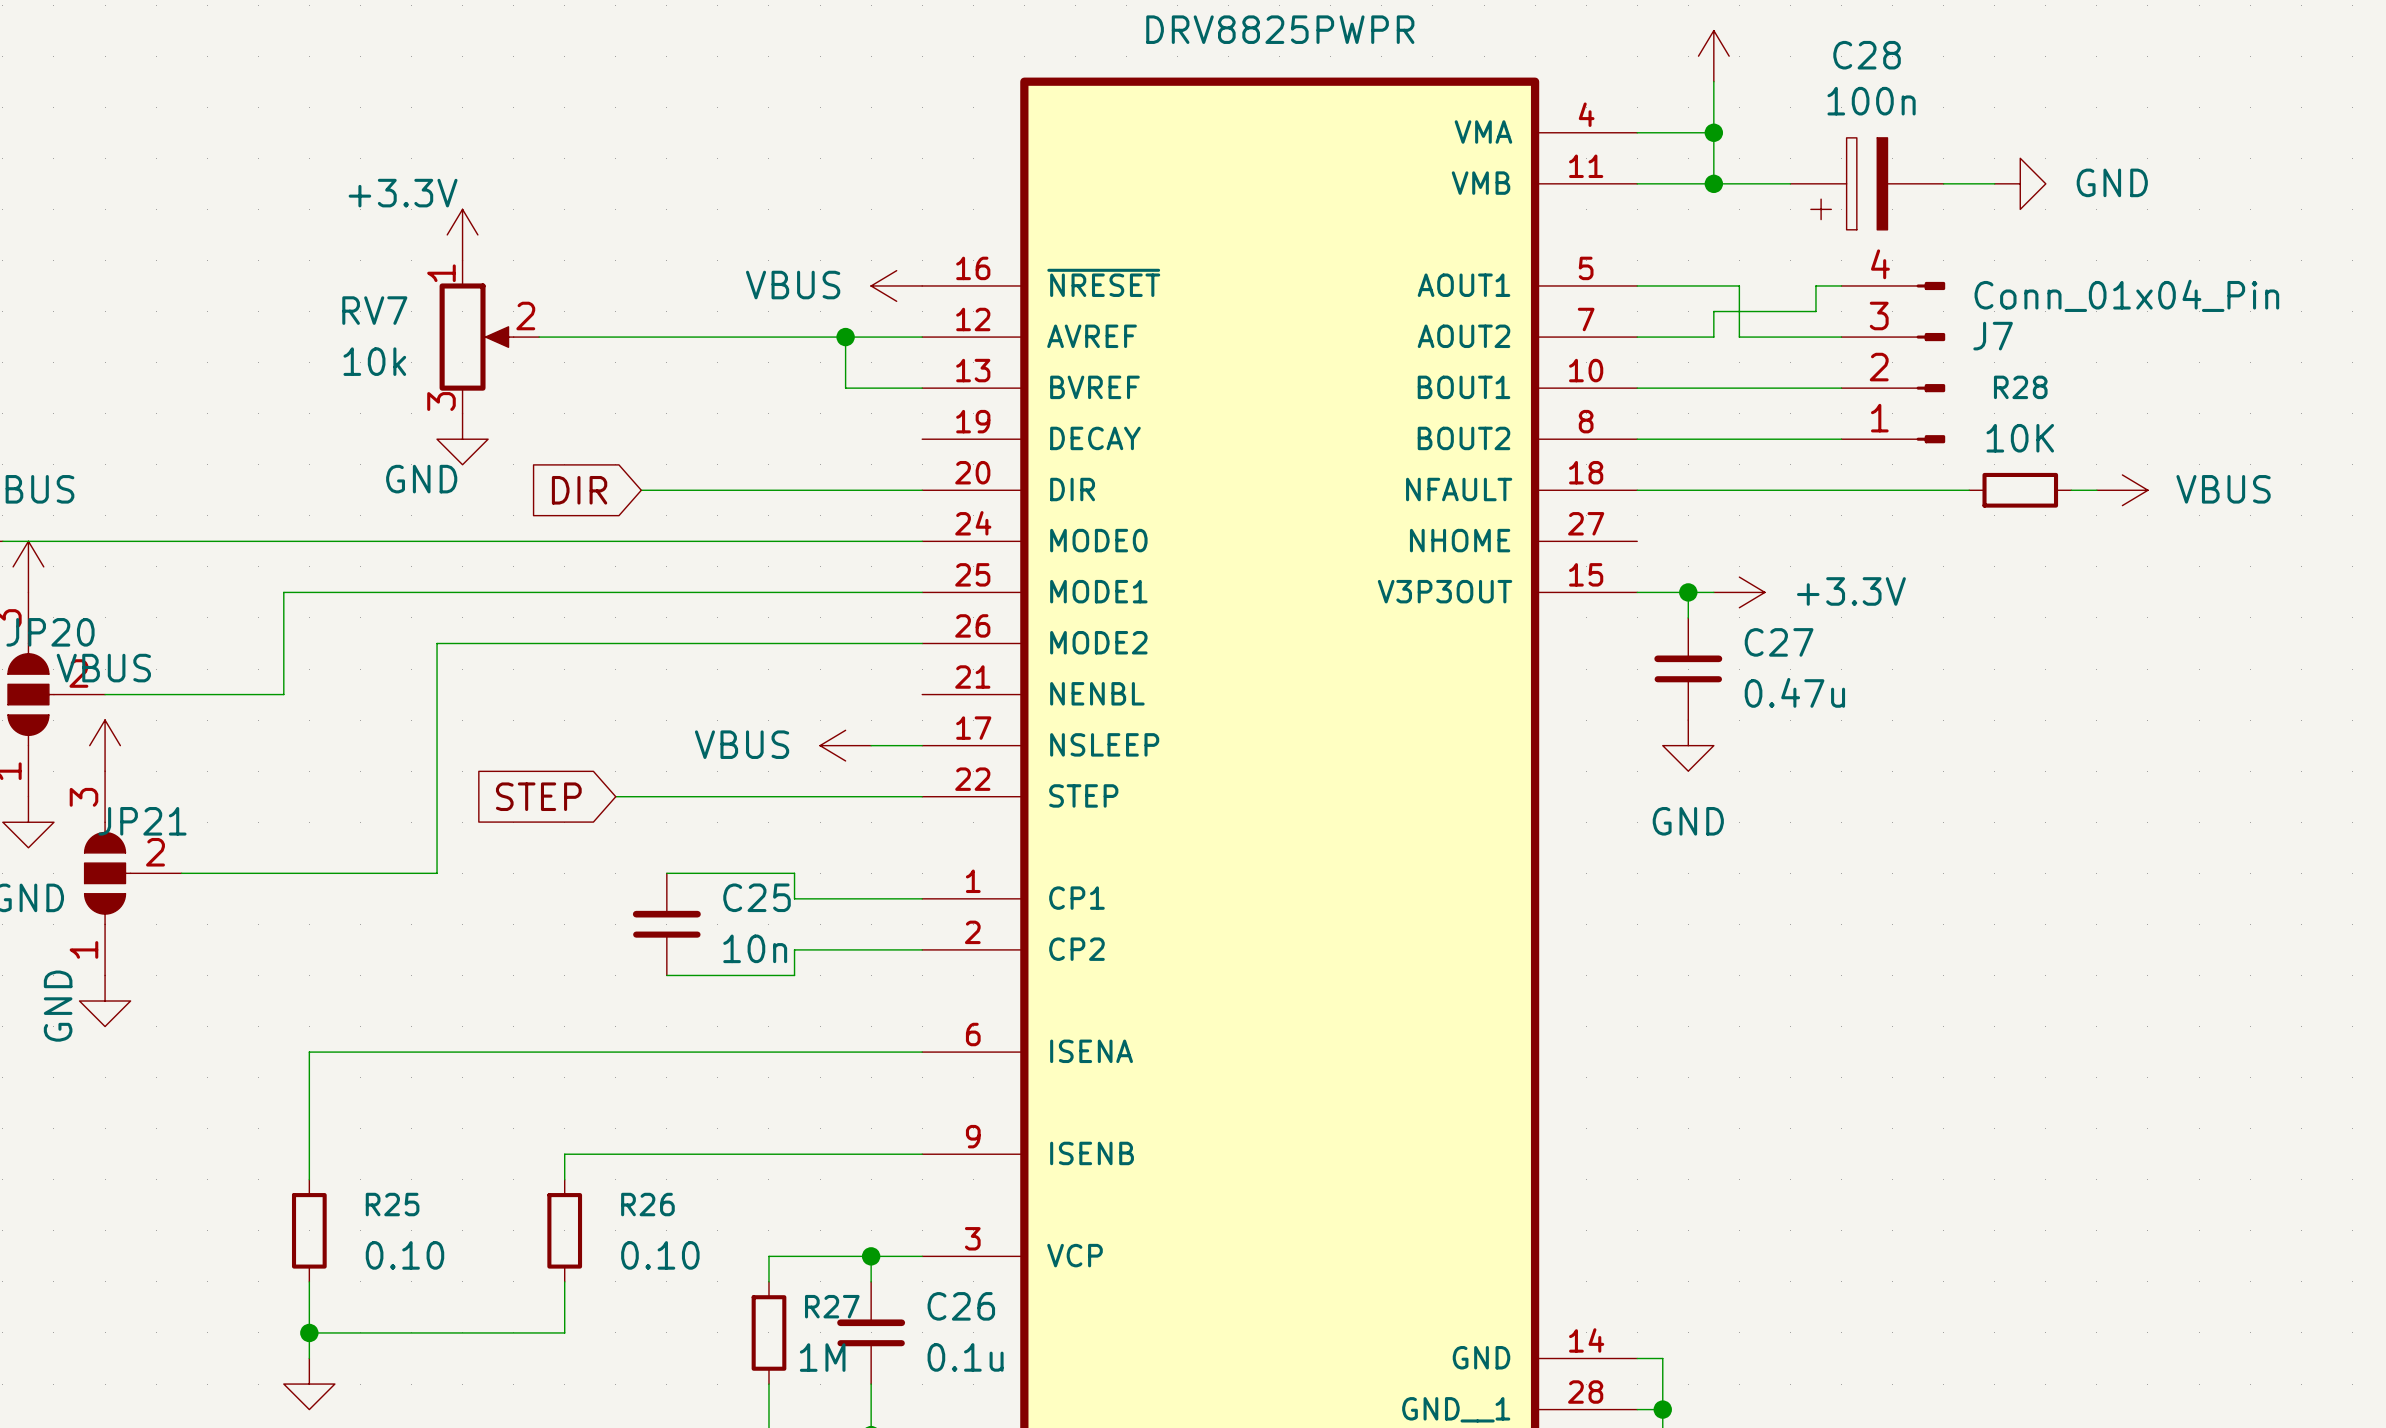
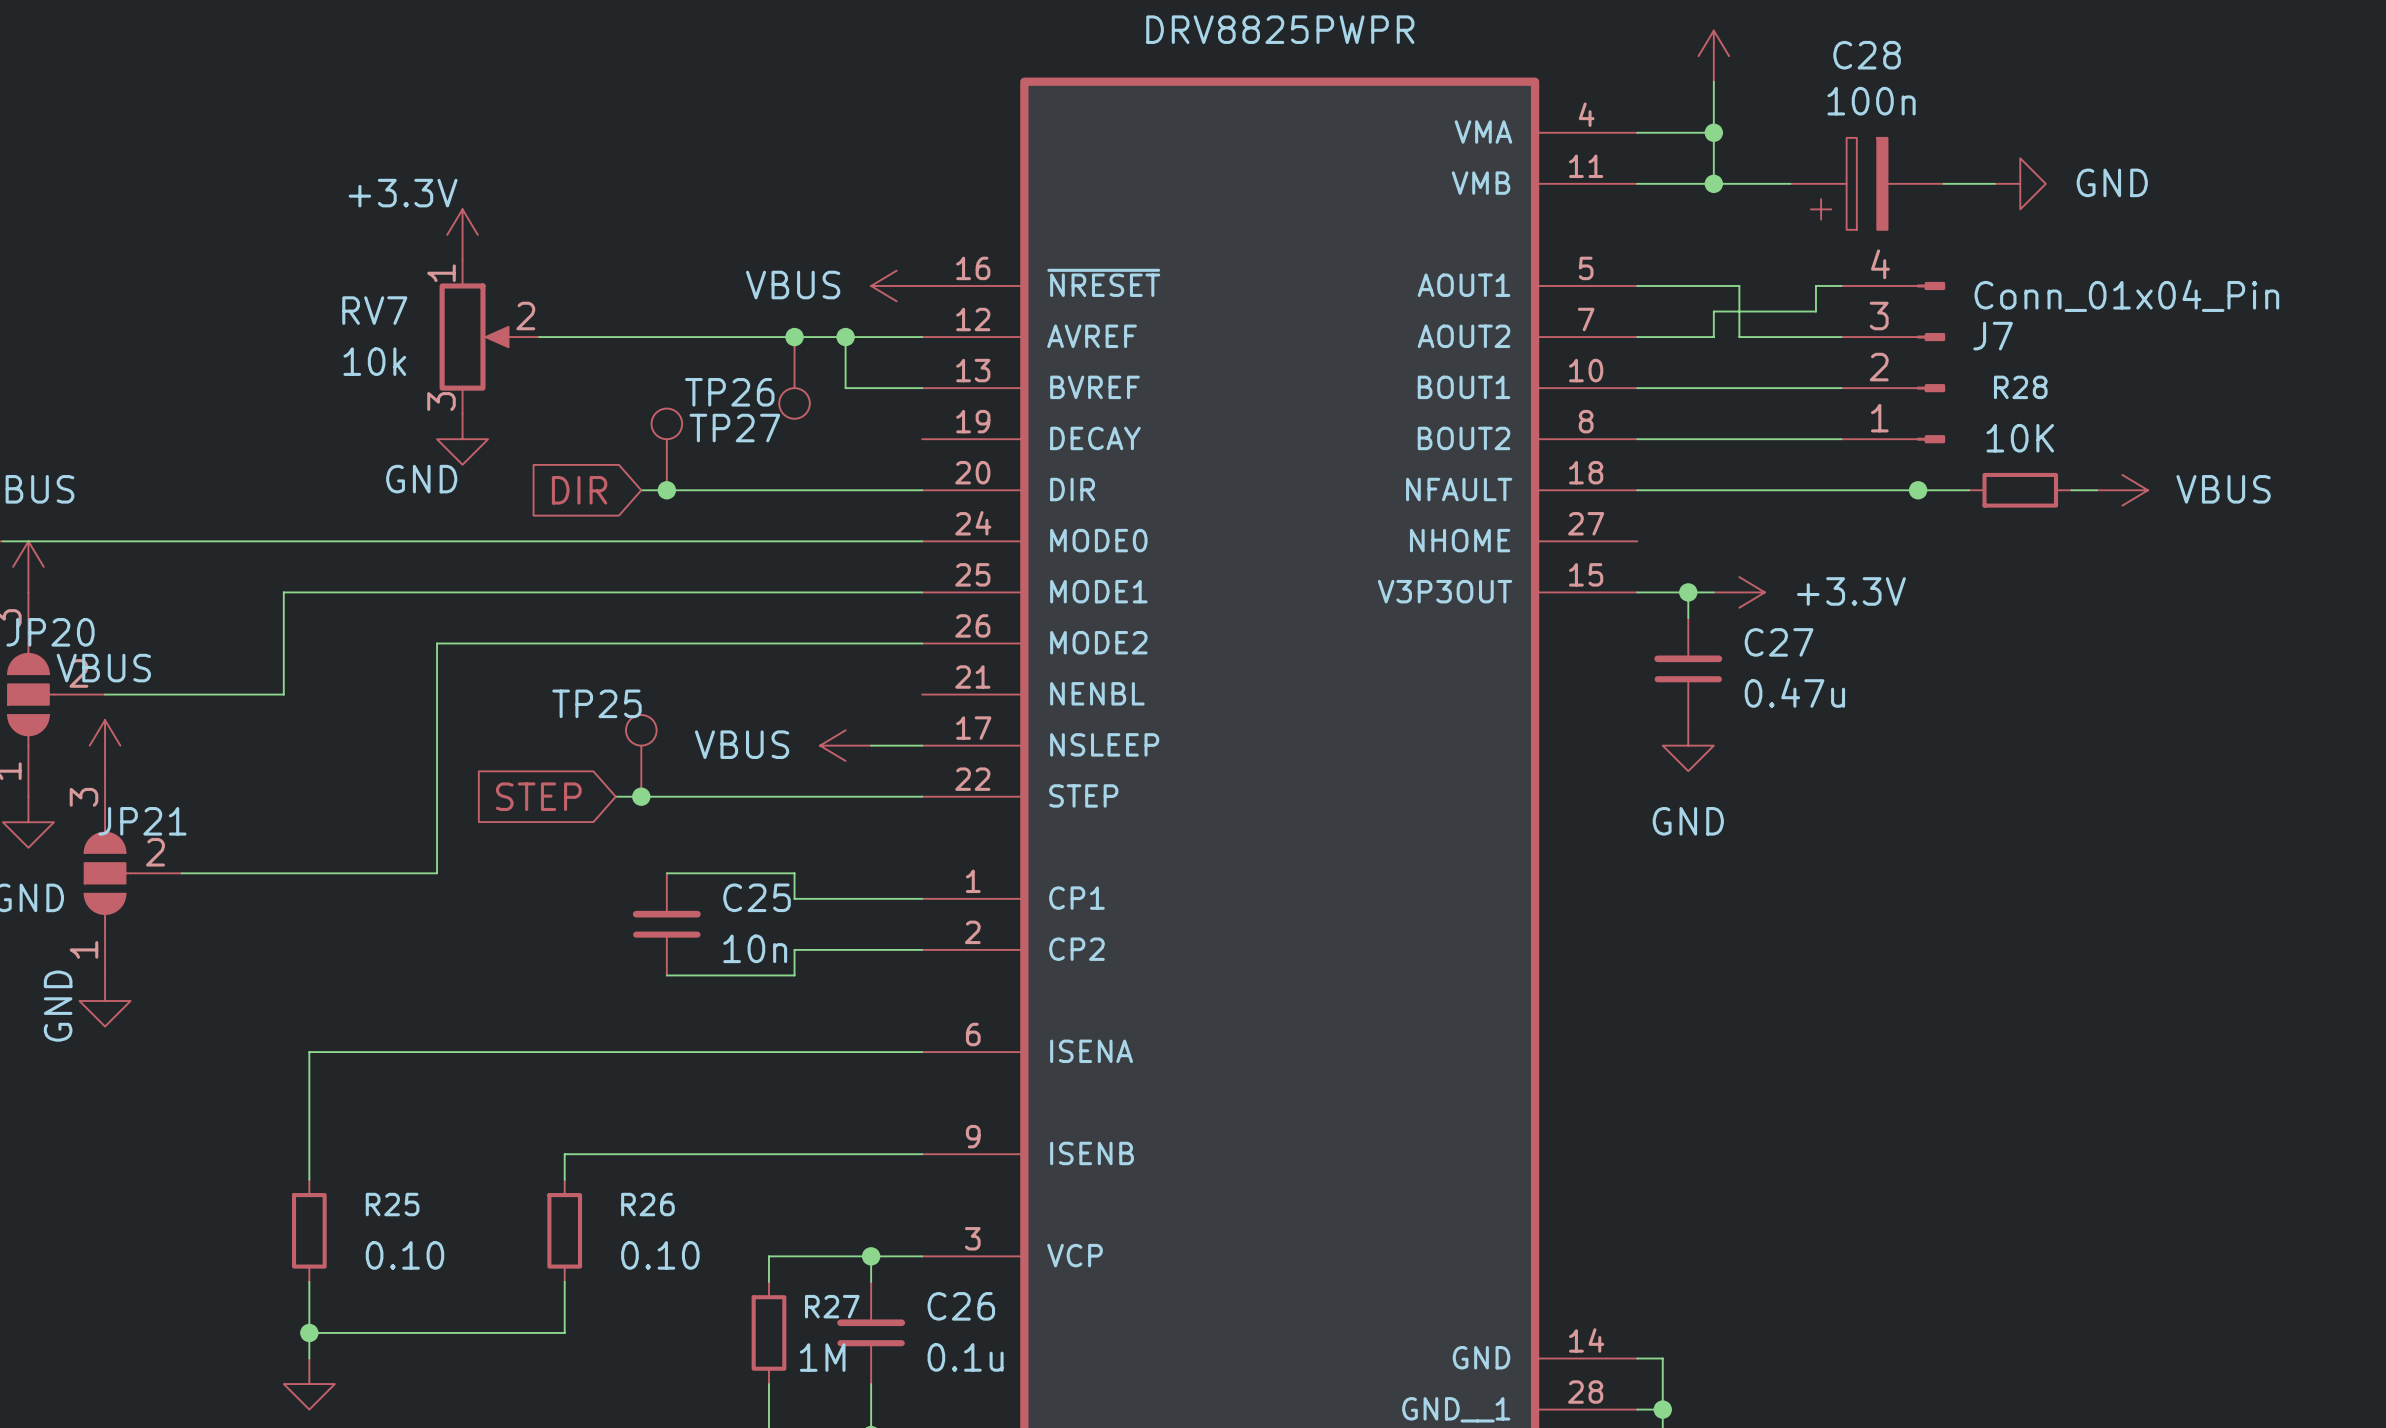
junction: none -> (794, 337)
TP27: none -> (794, 377)
TP26: none -> (666, 449)
junction: none -> (666, 490)
junction: none -> (1918, 490)
TP25: none -> (641, 755)
junction: none -> (641, 796)

